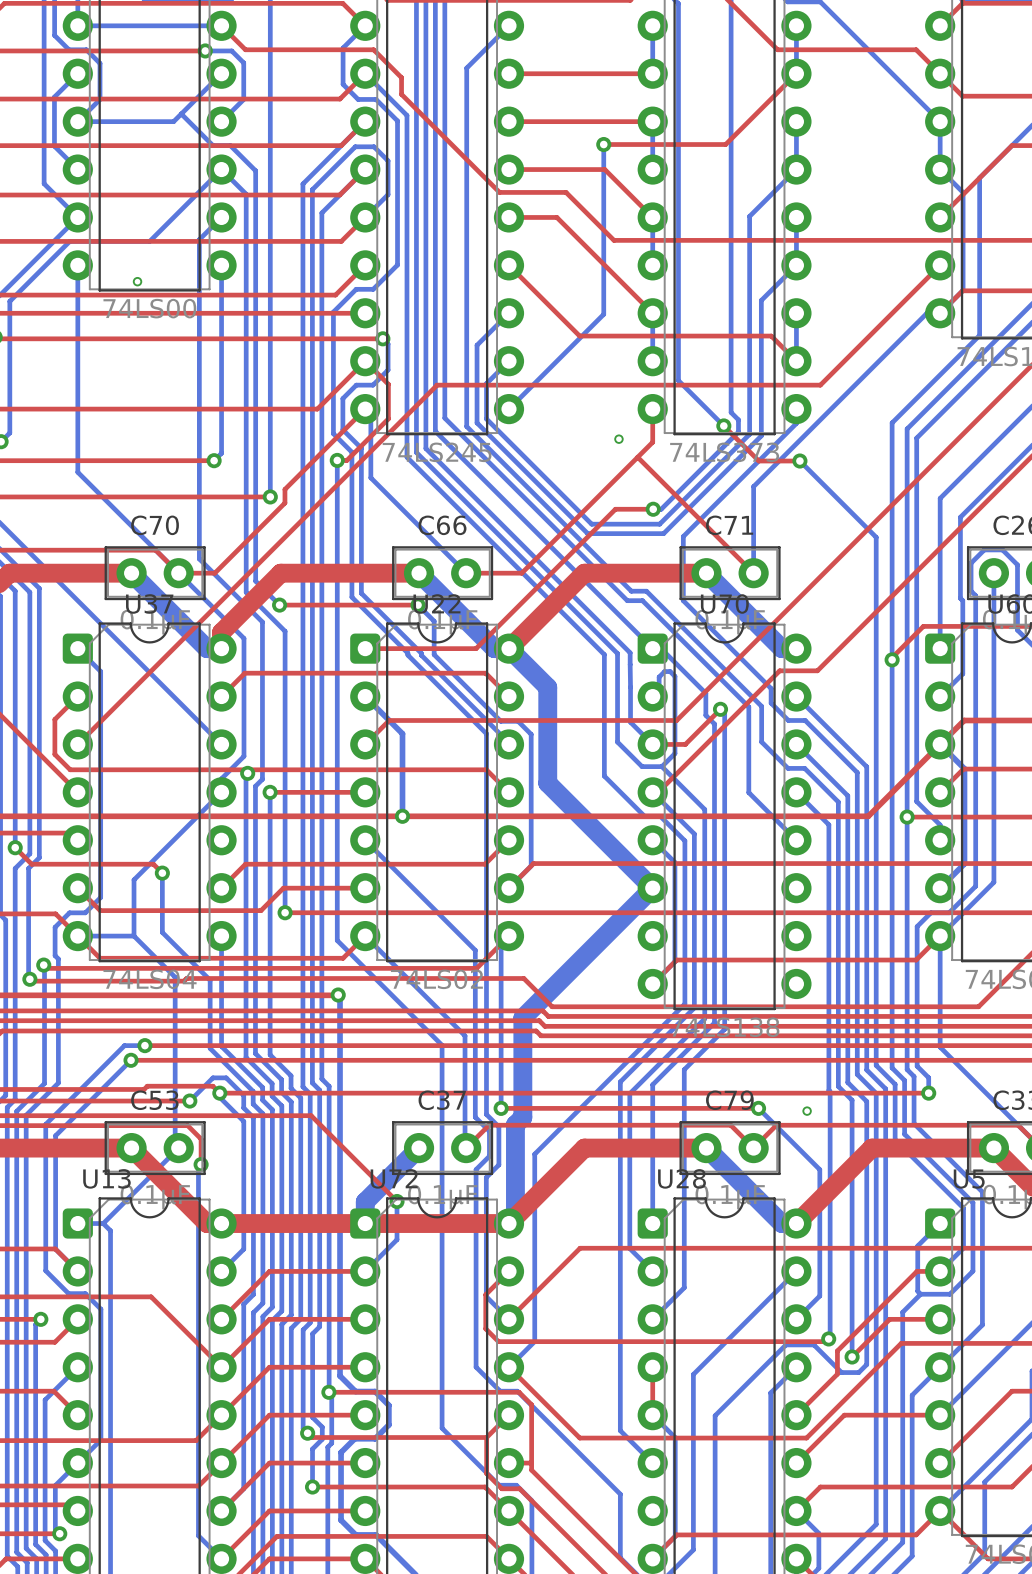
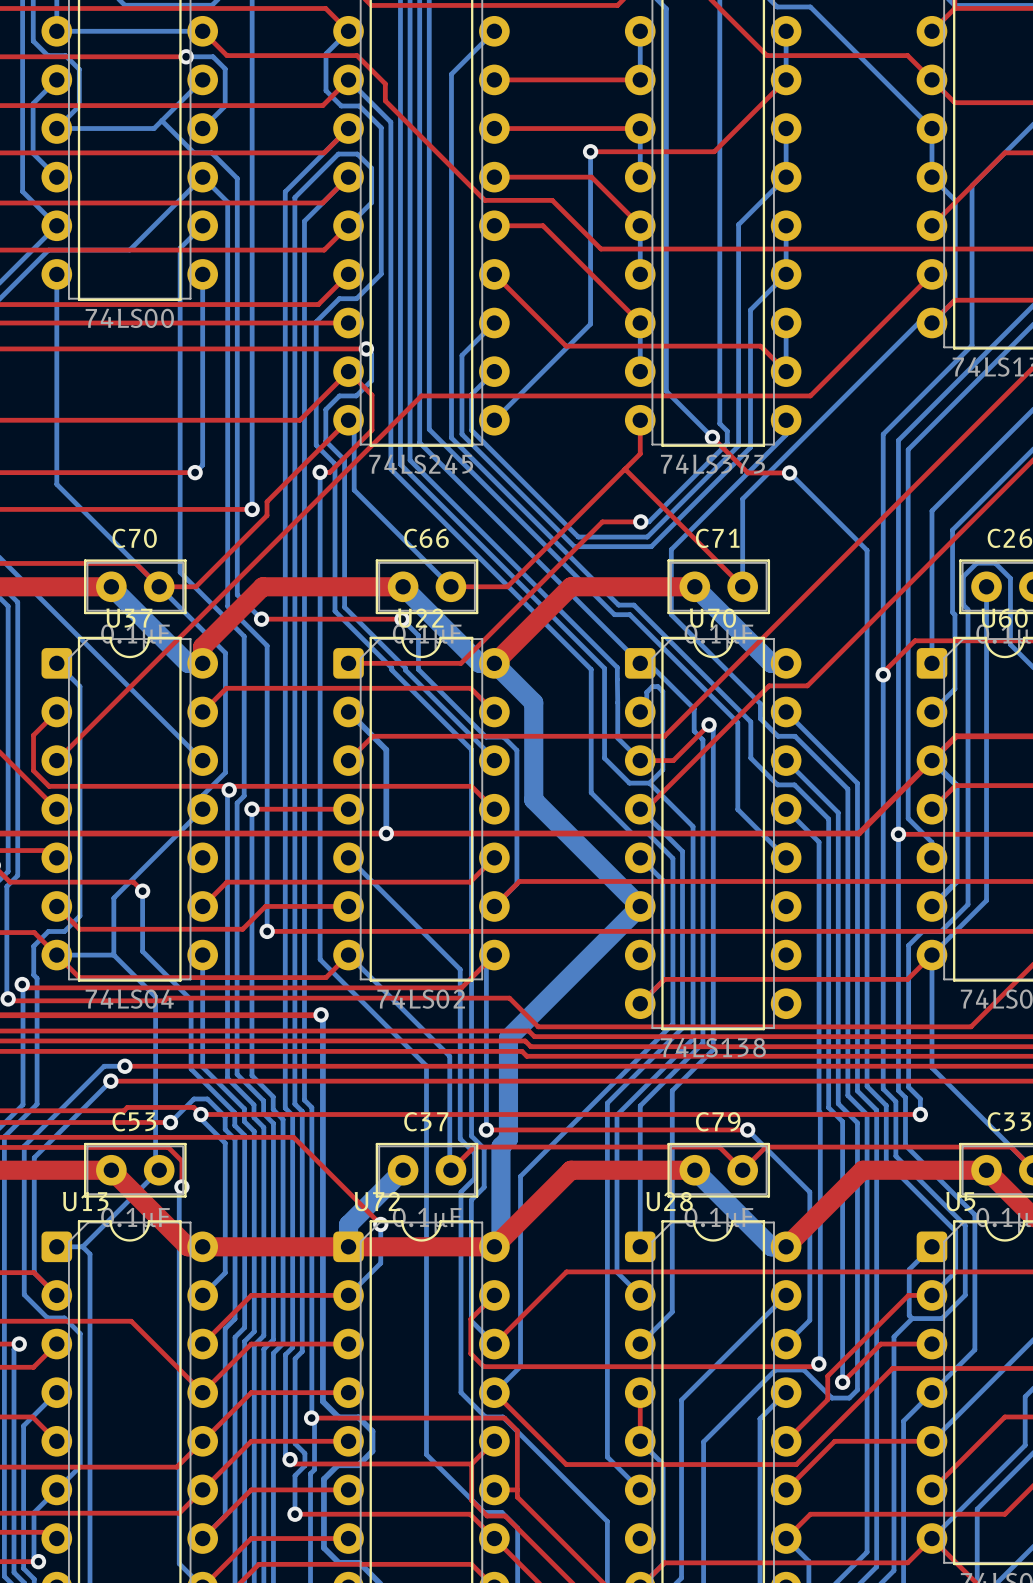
via: (137, 281) -> none
via: (618, 439) -> none
via: (807, 1111) -> none

